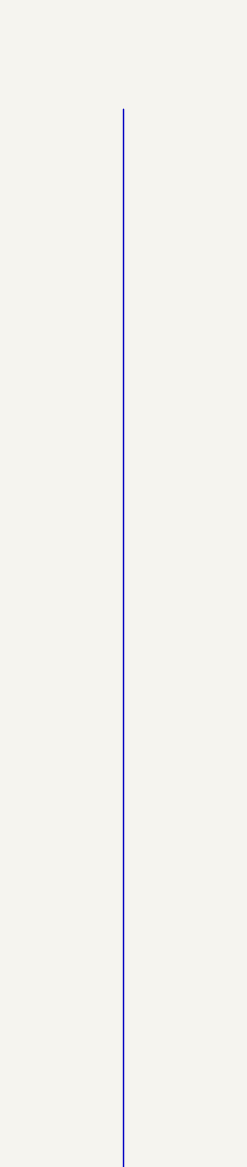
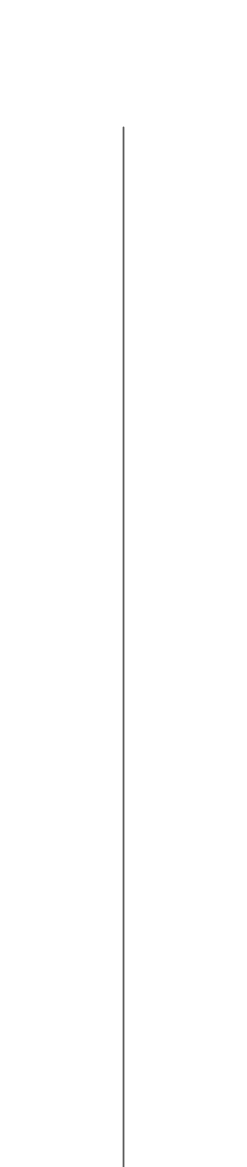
line: (123, 109) (123, 127) -> none

